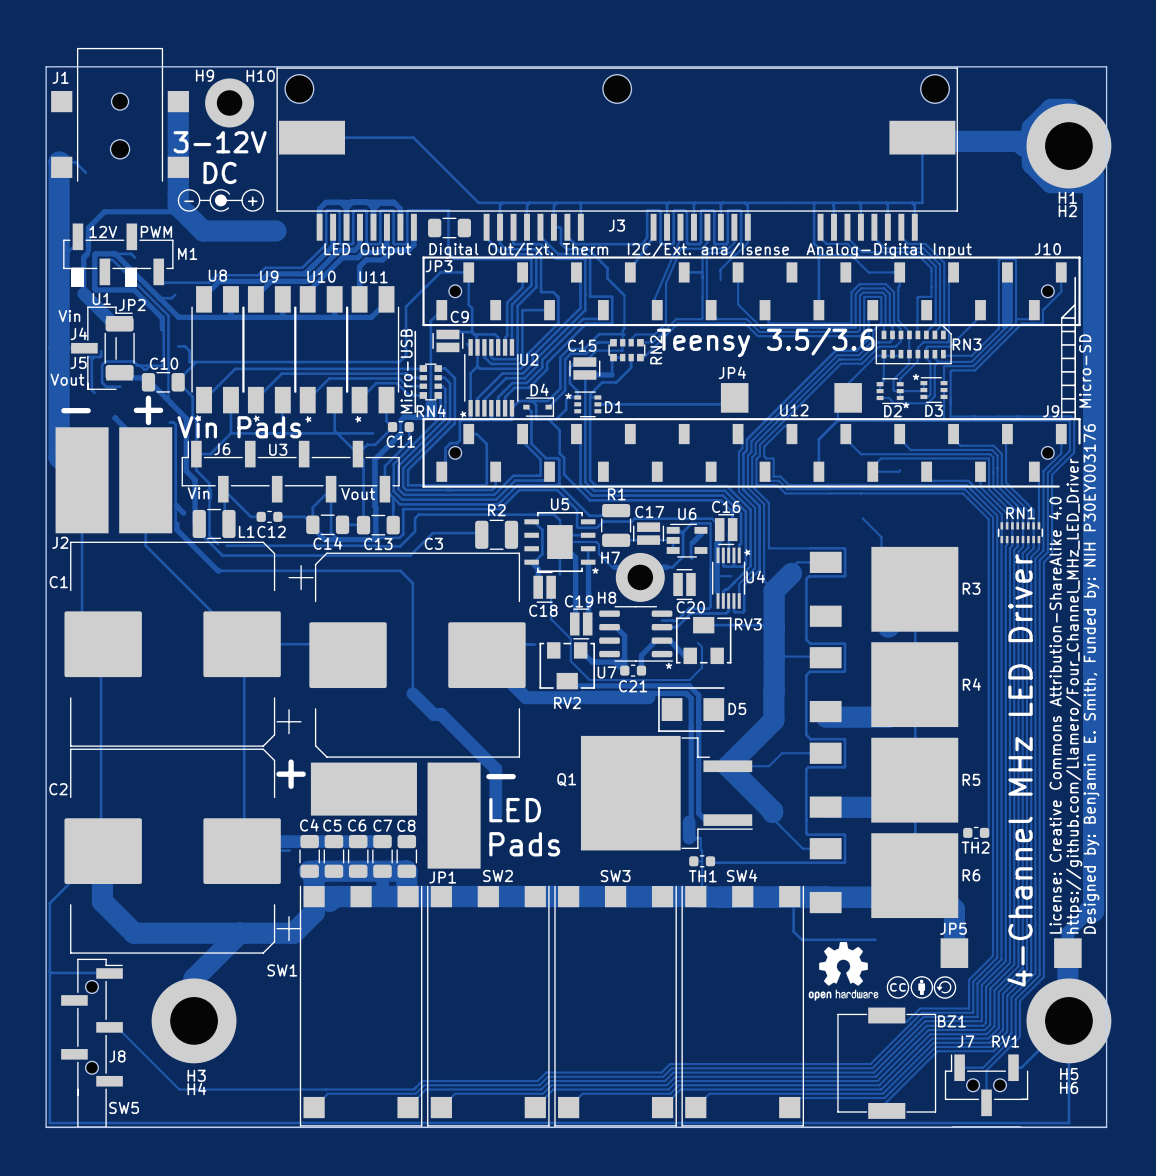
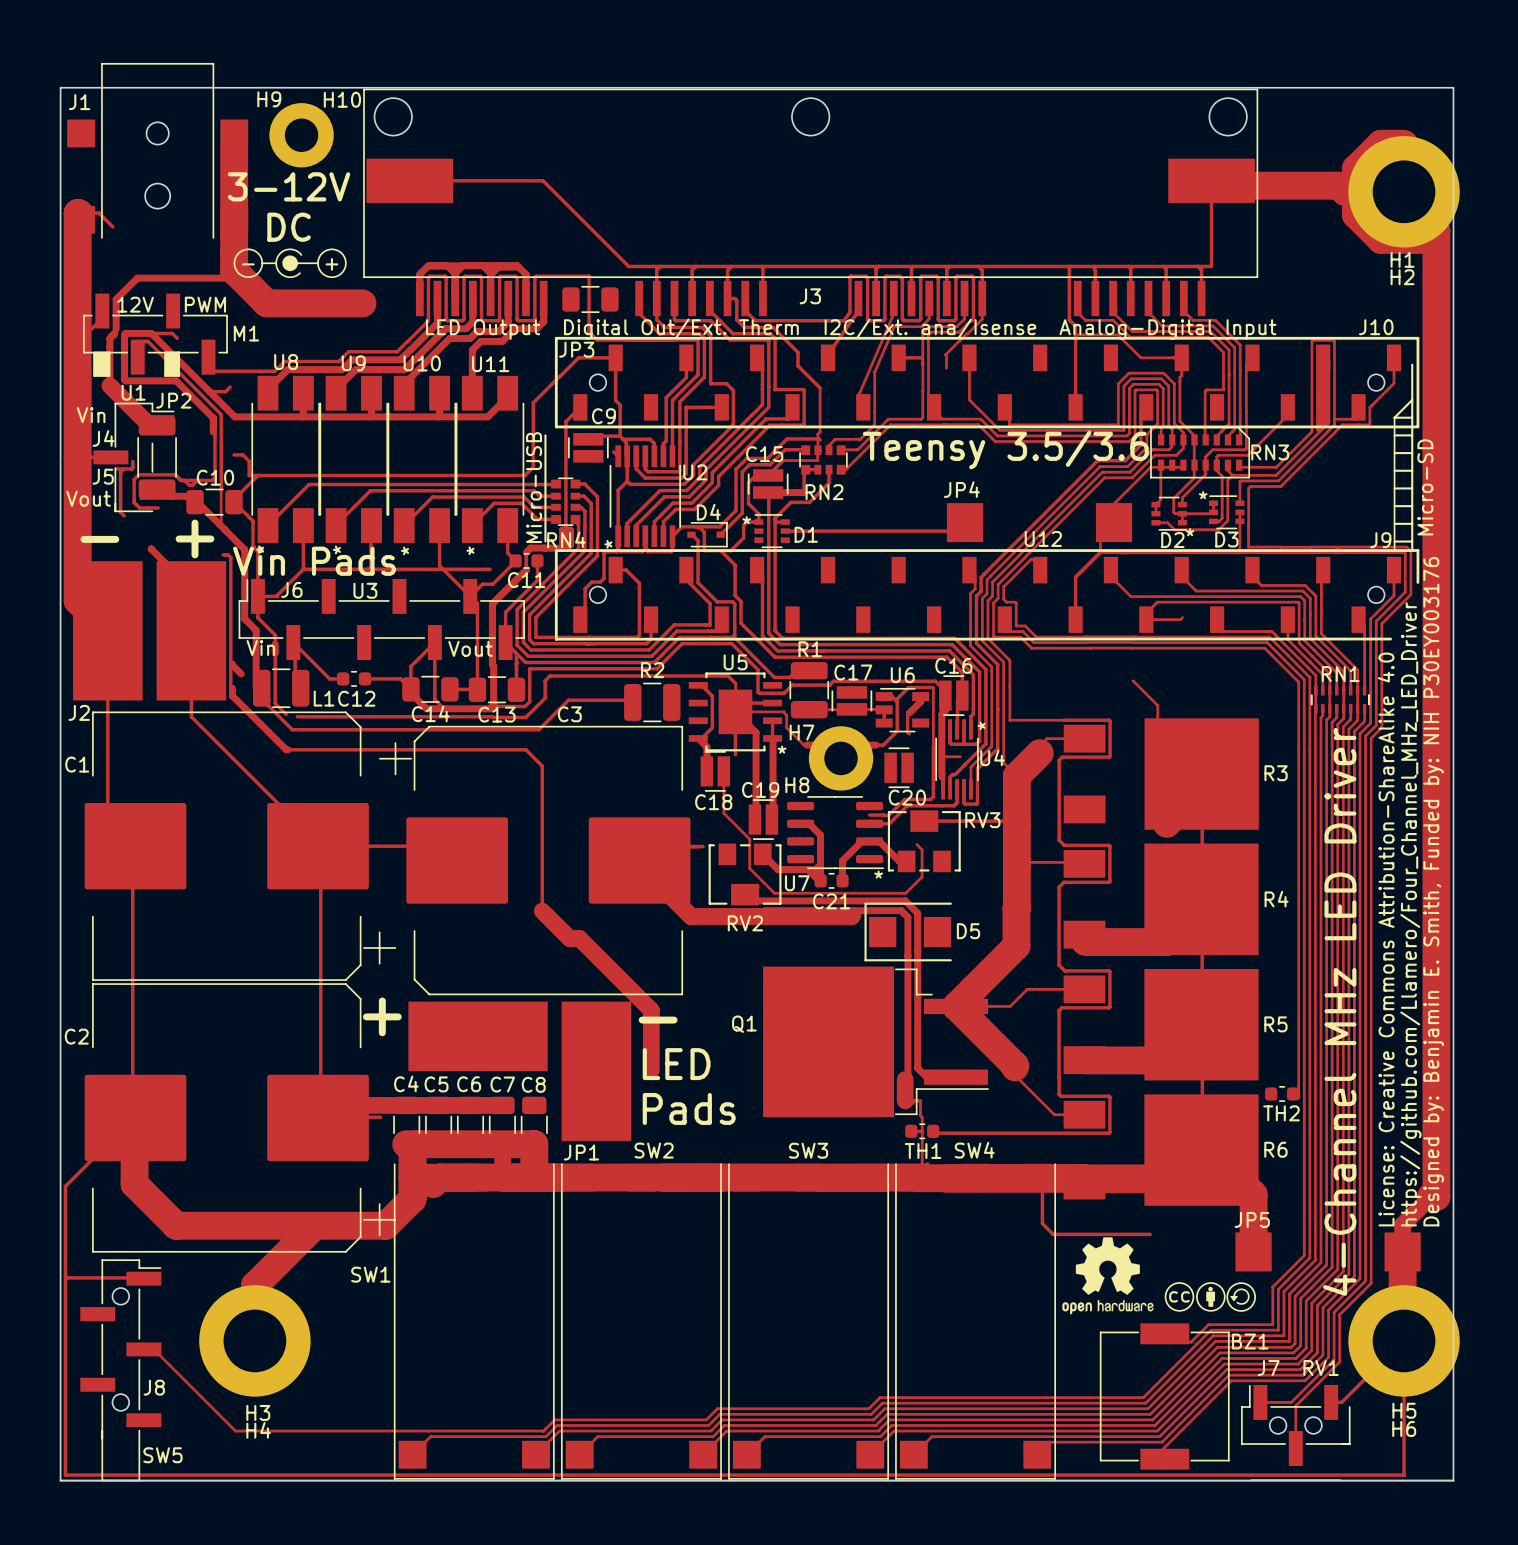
RN2 name rotation: 0° (656, 349) -> 90° clockwise (824, 492)
RN2 name position: RN2 (656, 349) -> RN2 (824, 492)

